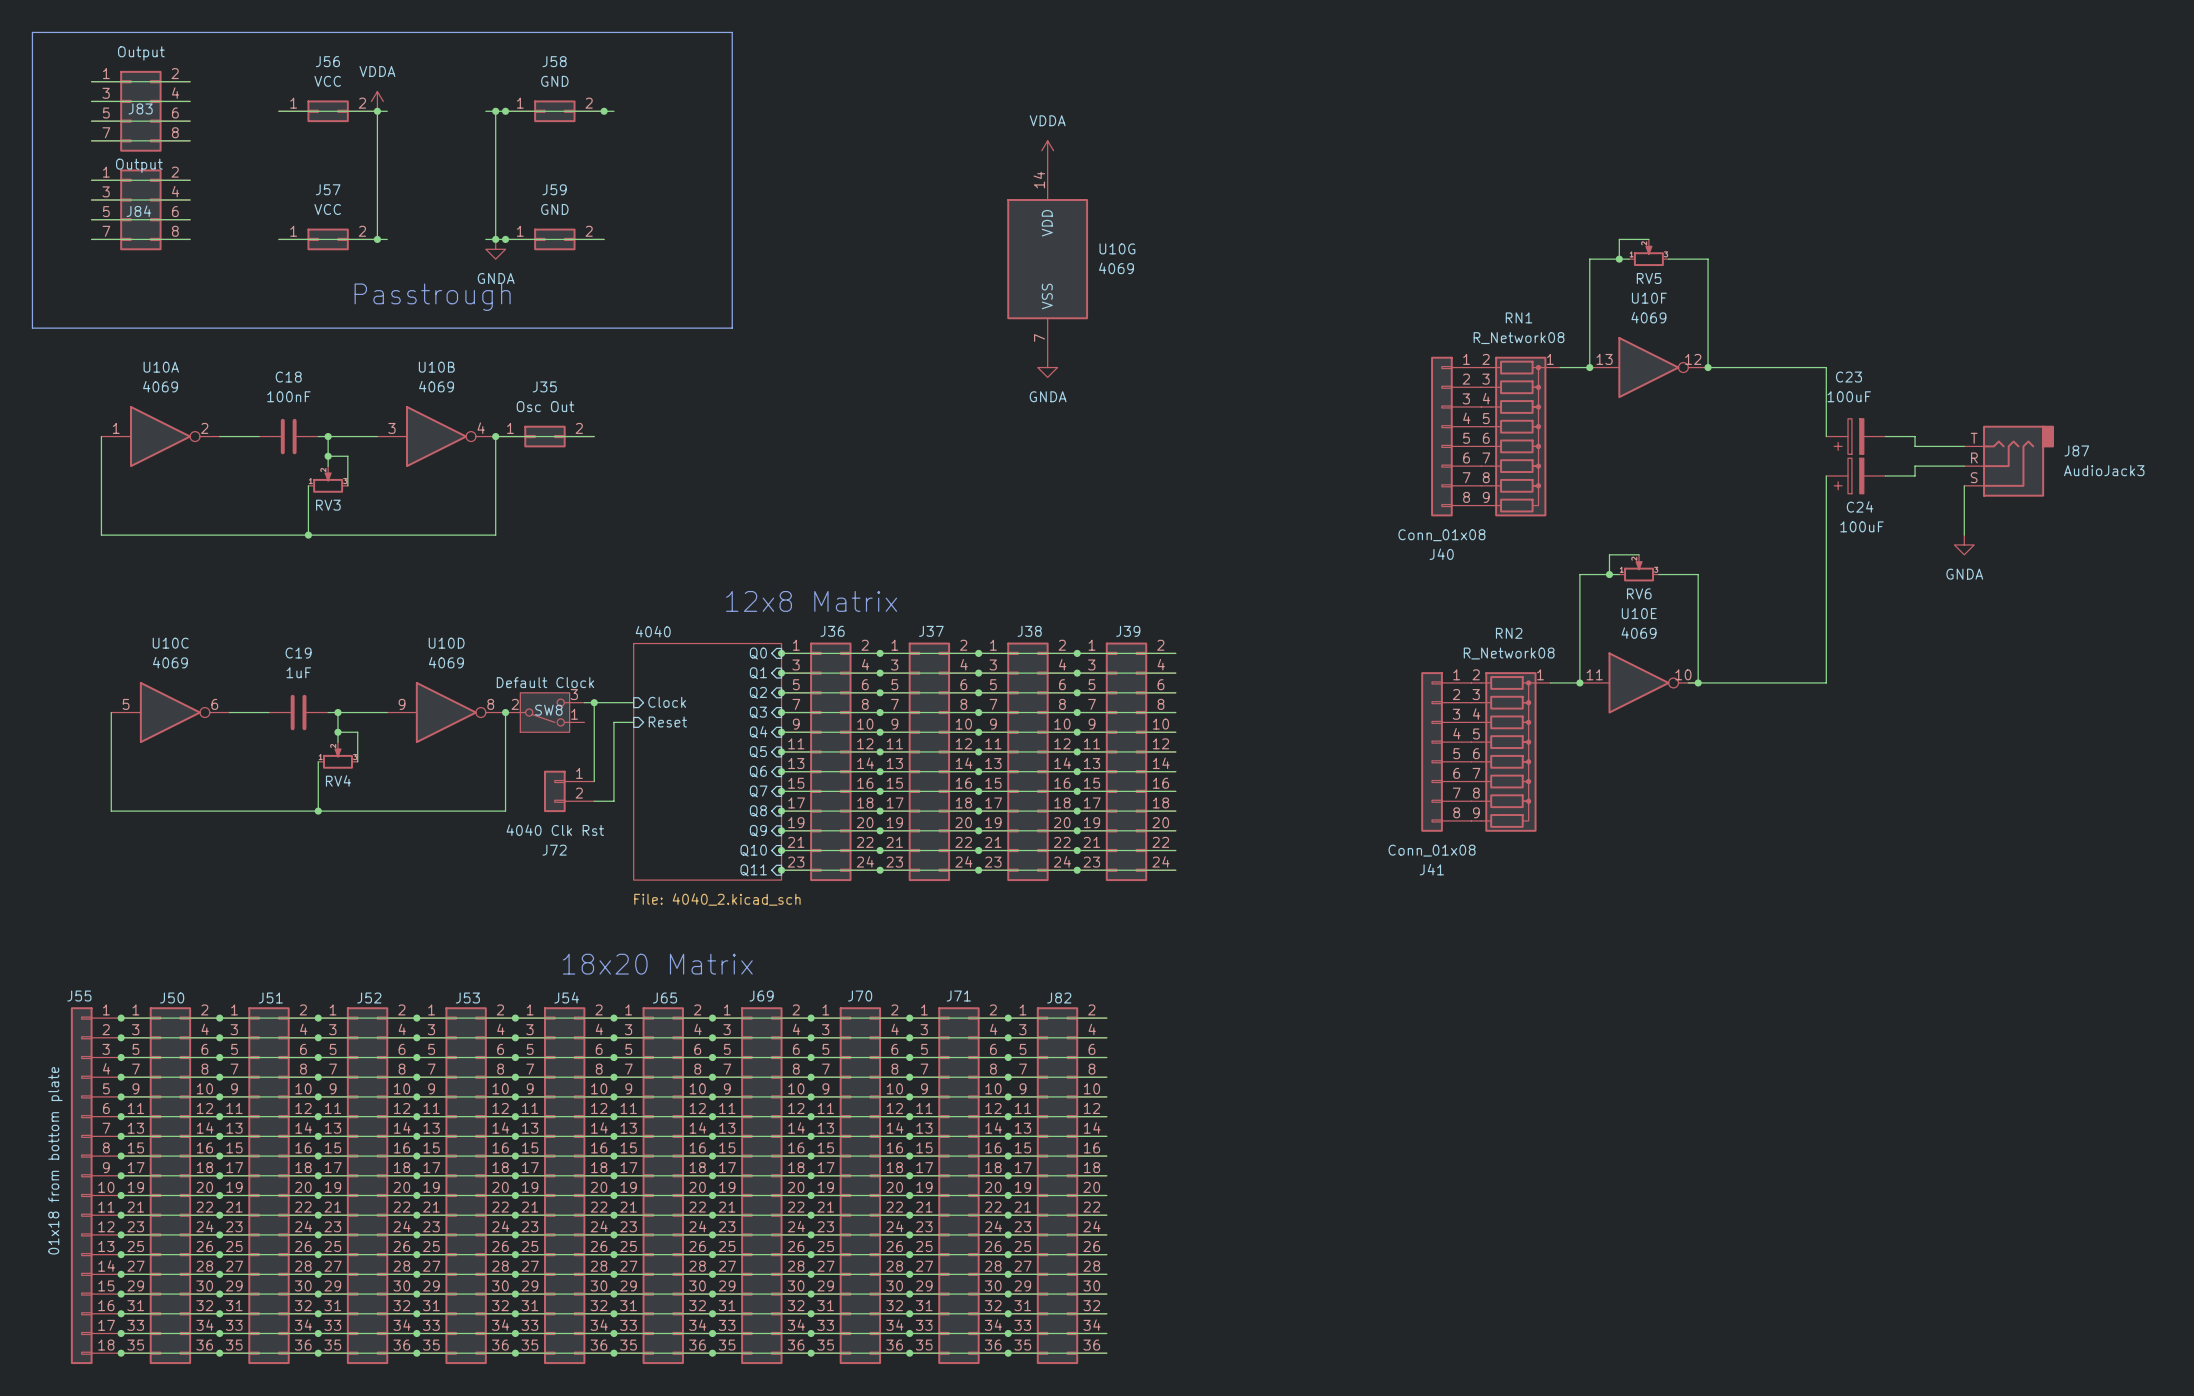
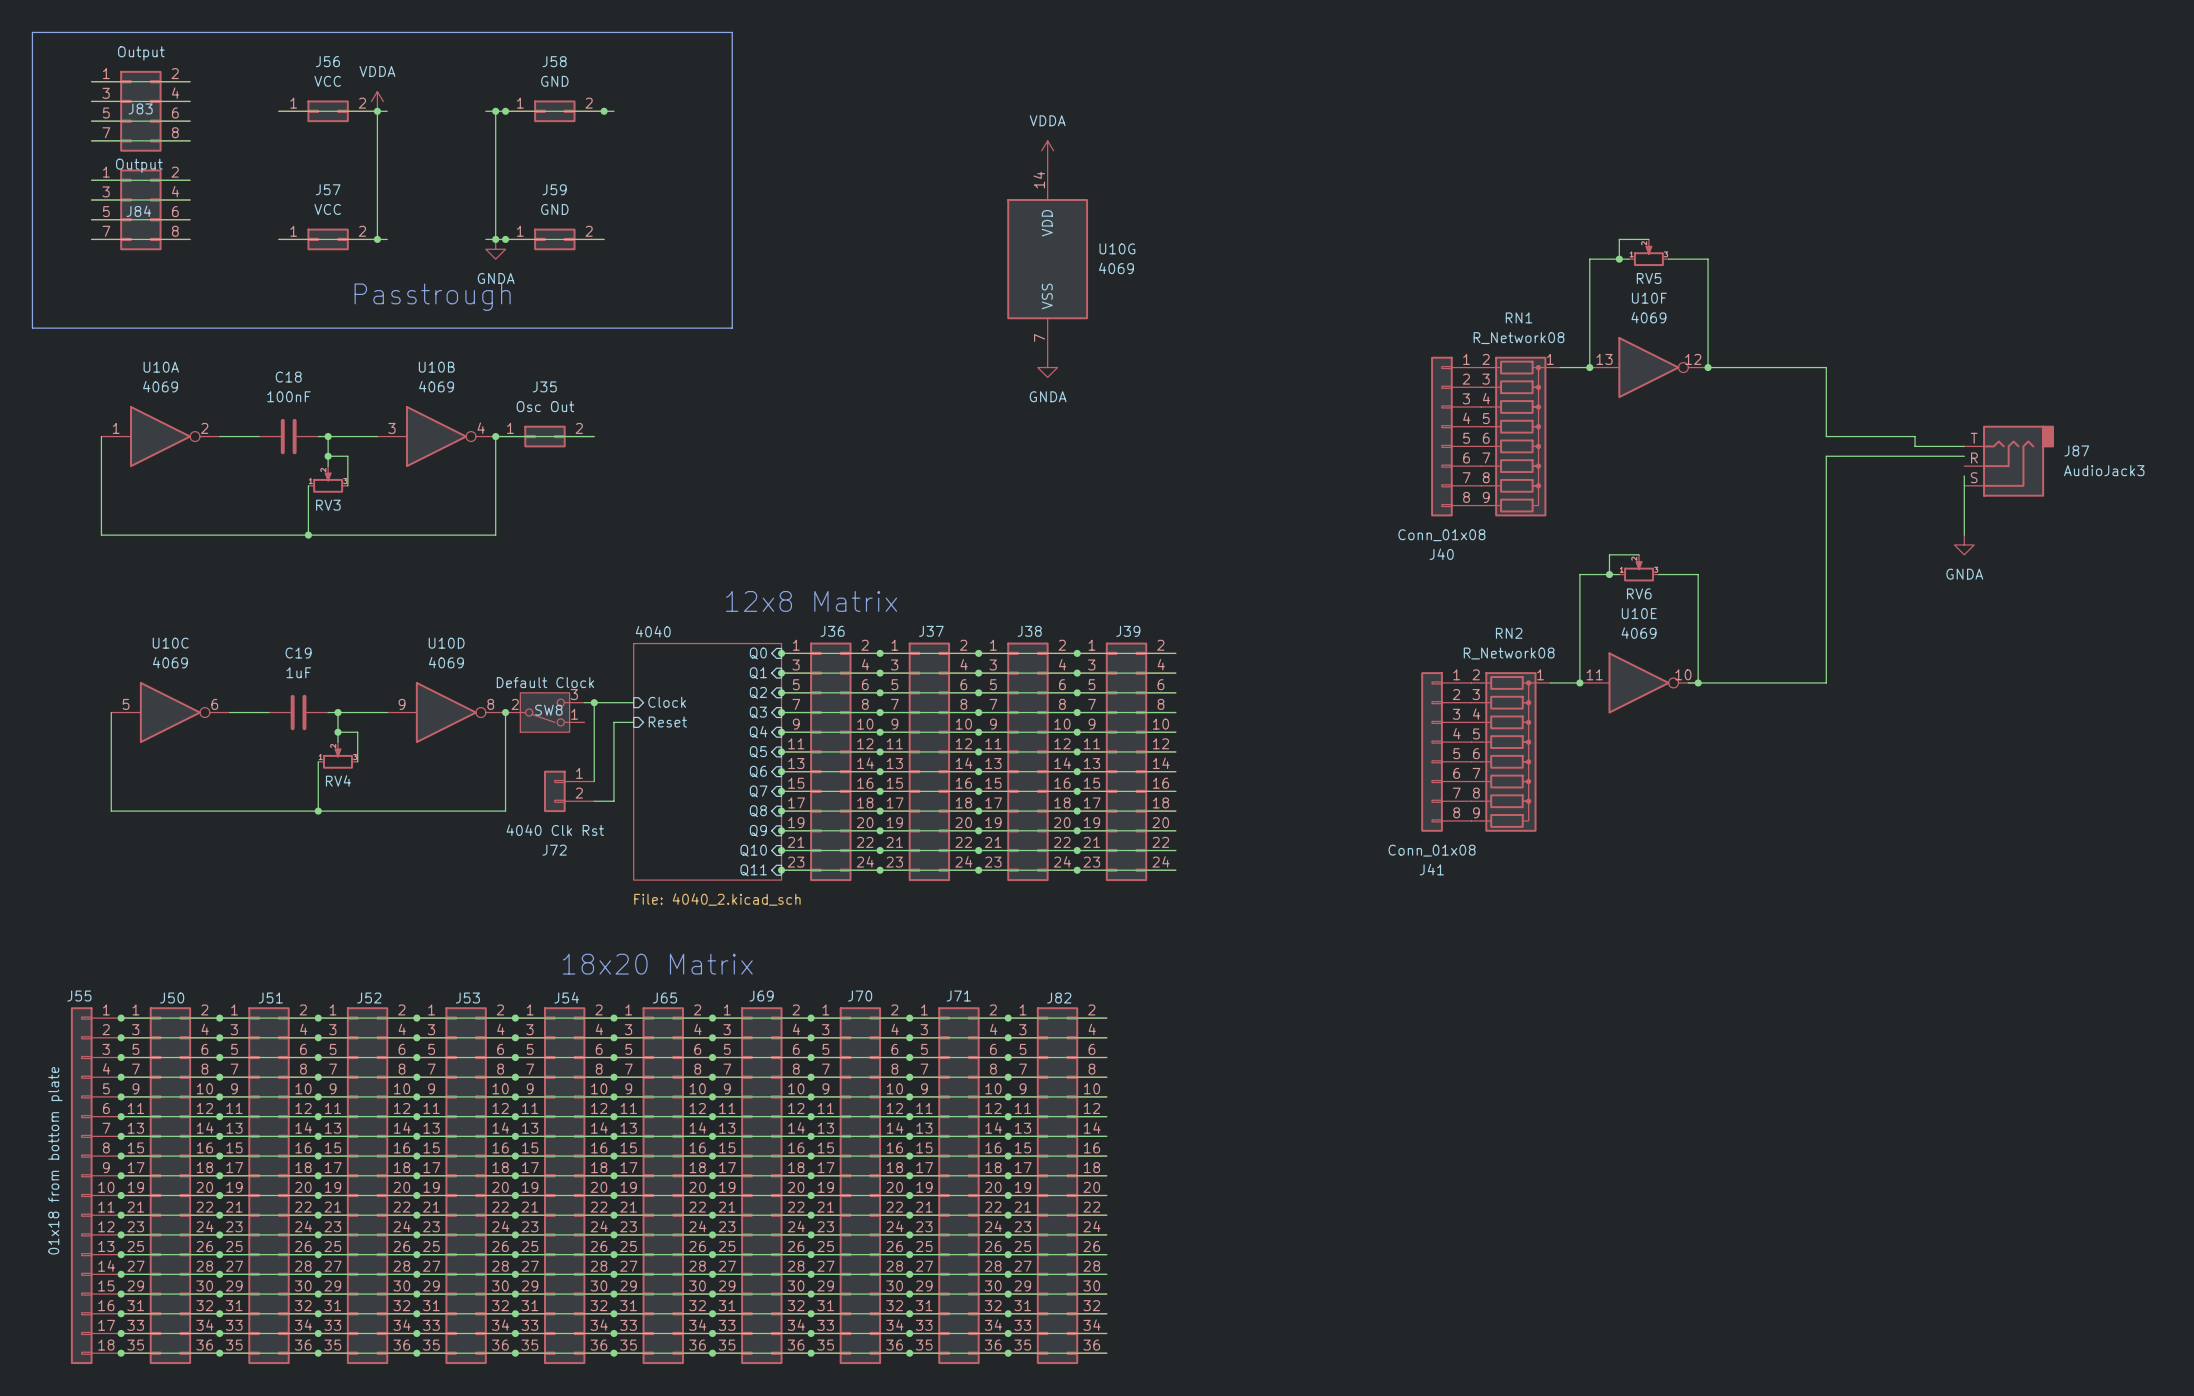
C23: 100uF (1855, 436) -> none
wire: none -> (1964, 456) (1826, 456) (1826, 475)
wire: (1964, 466) (1915, 466) (1915, 475) (1885, 475) -> none
C24: 100uF (1855, 475) -> none
wire: none -> (1964, 475) (1964, 485)

